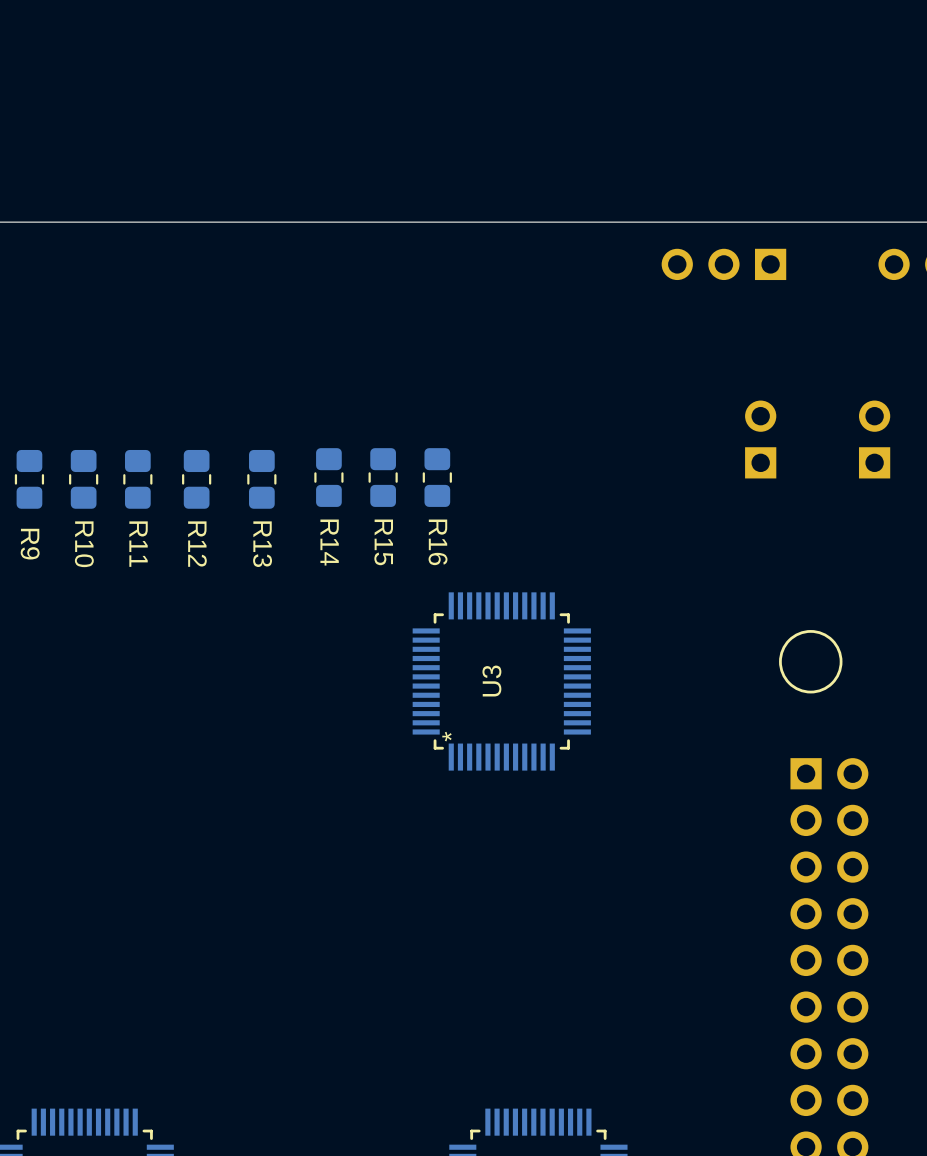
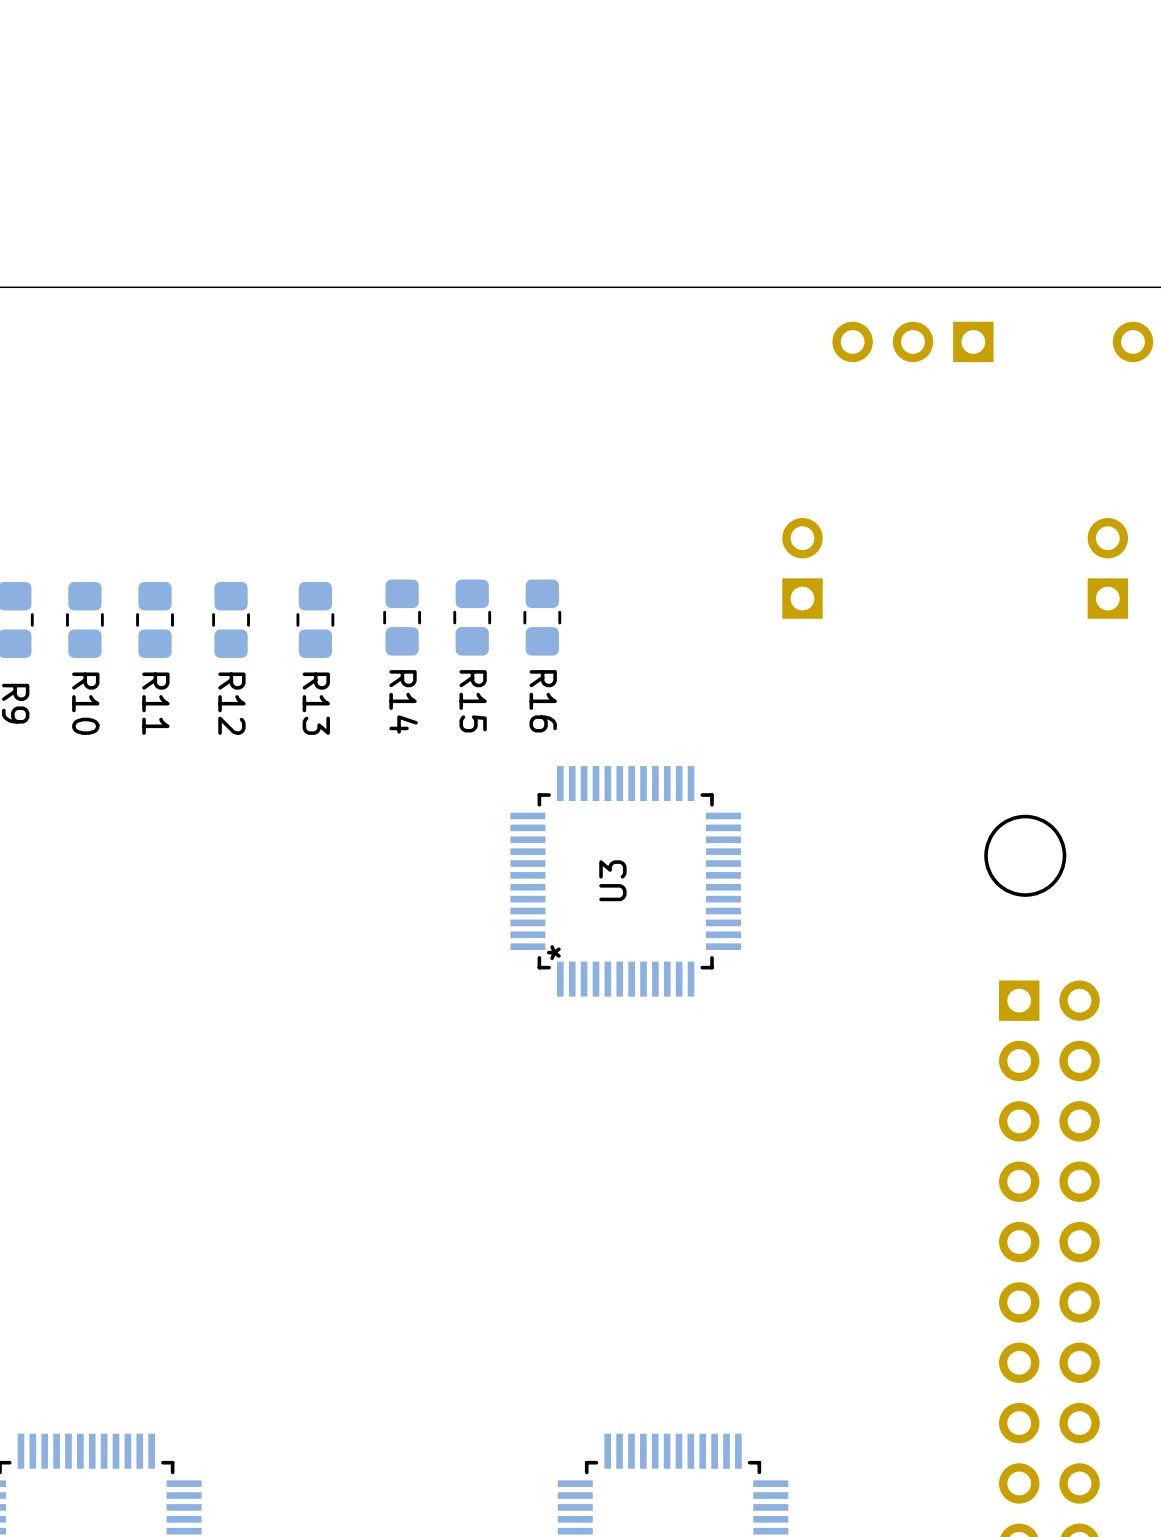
part position: (760, 439) -> (802, 568)

